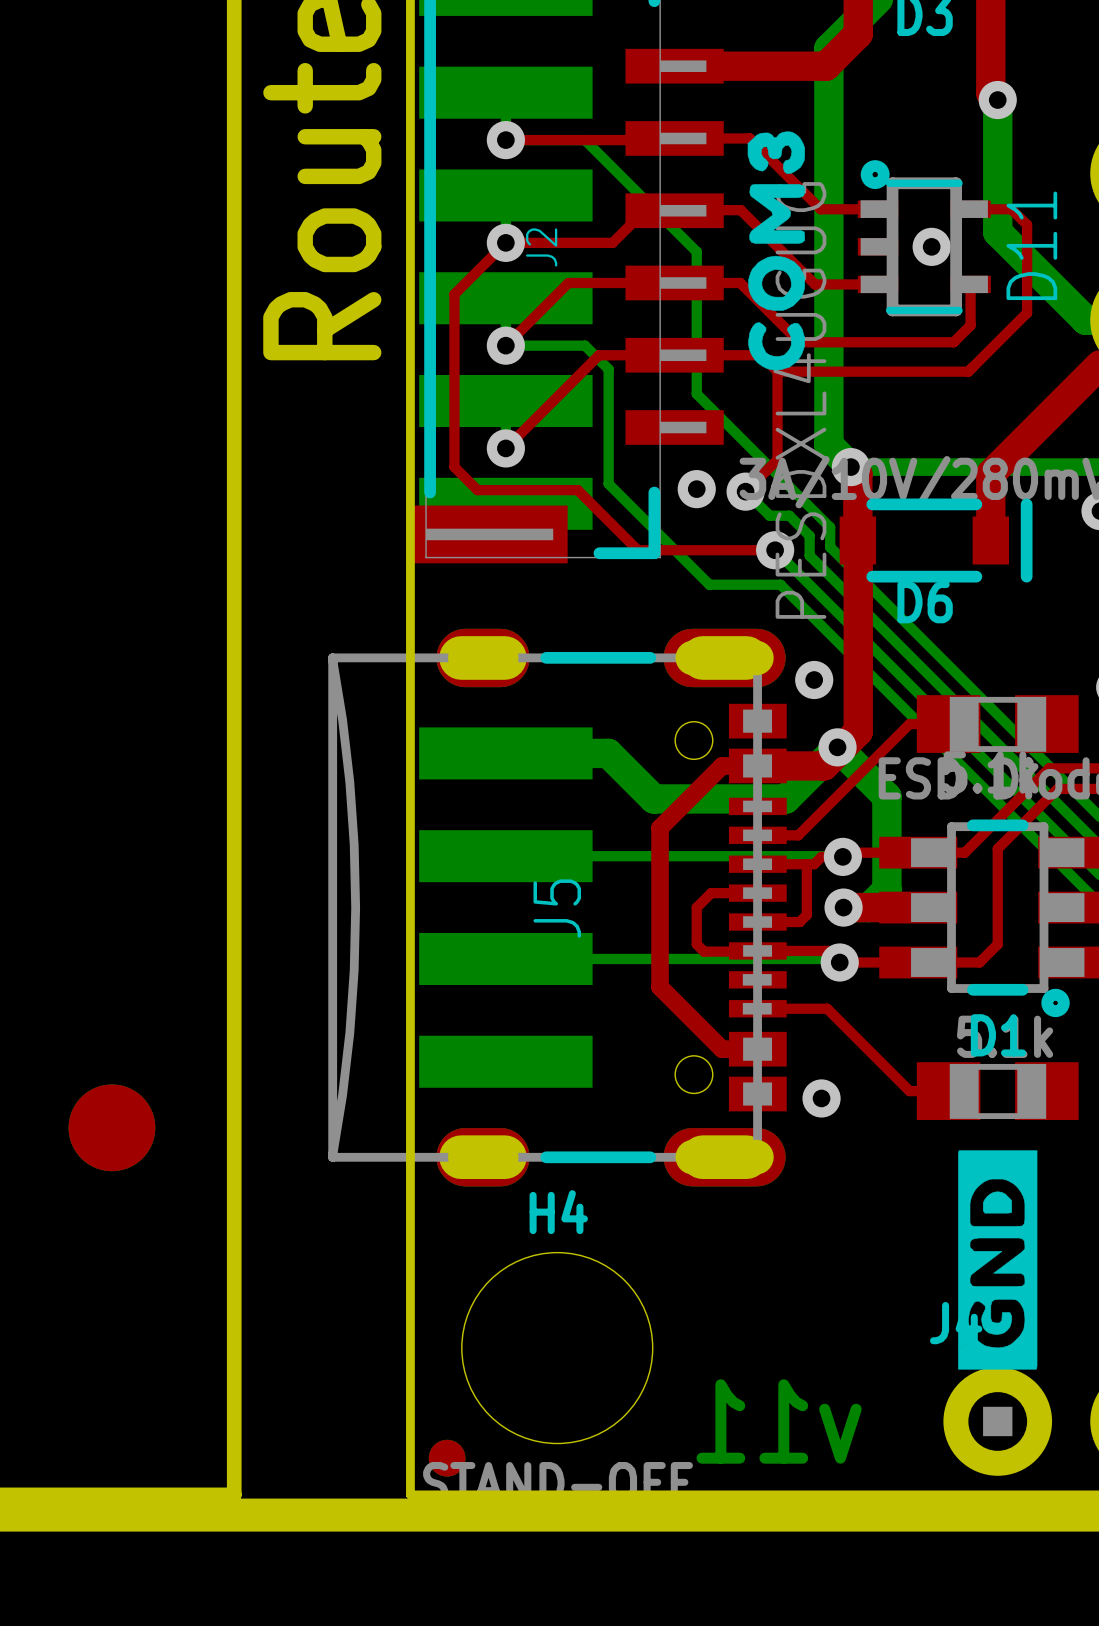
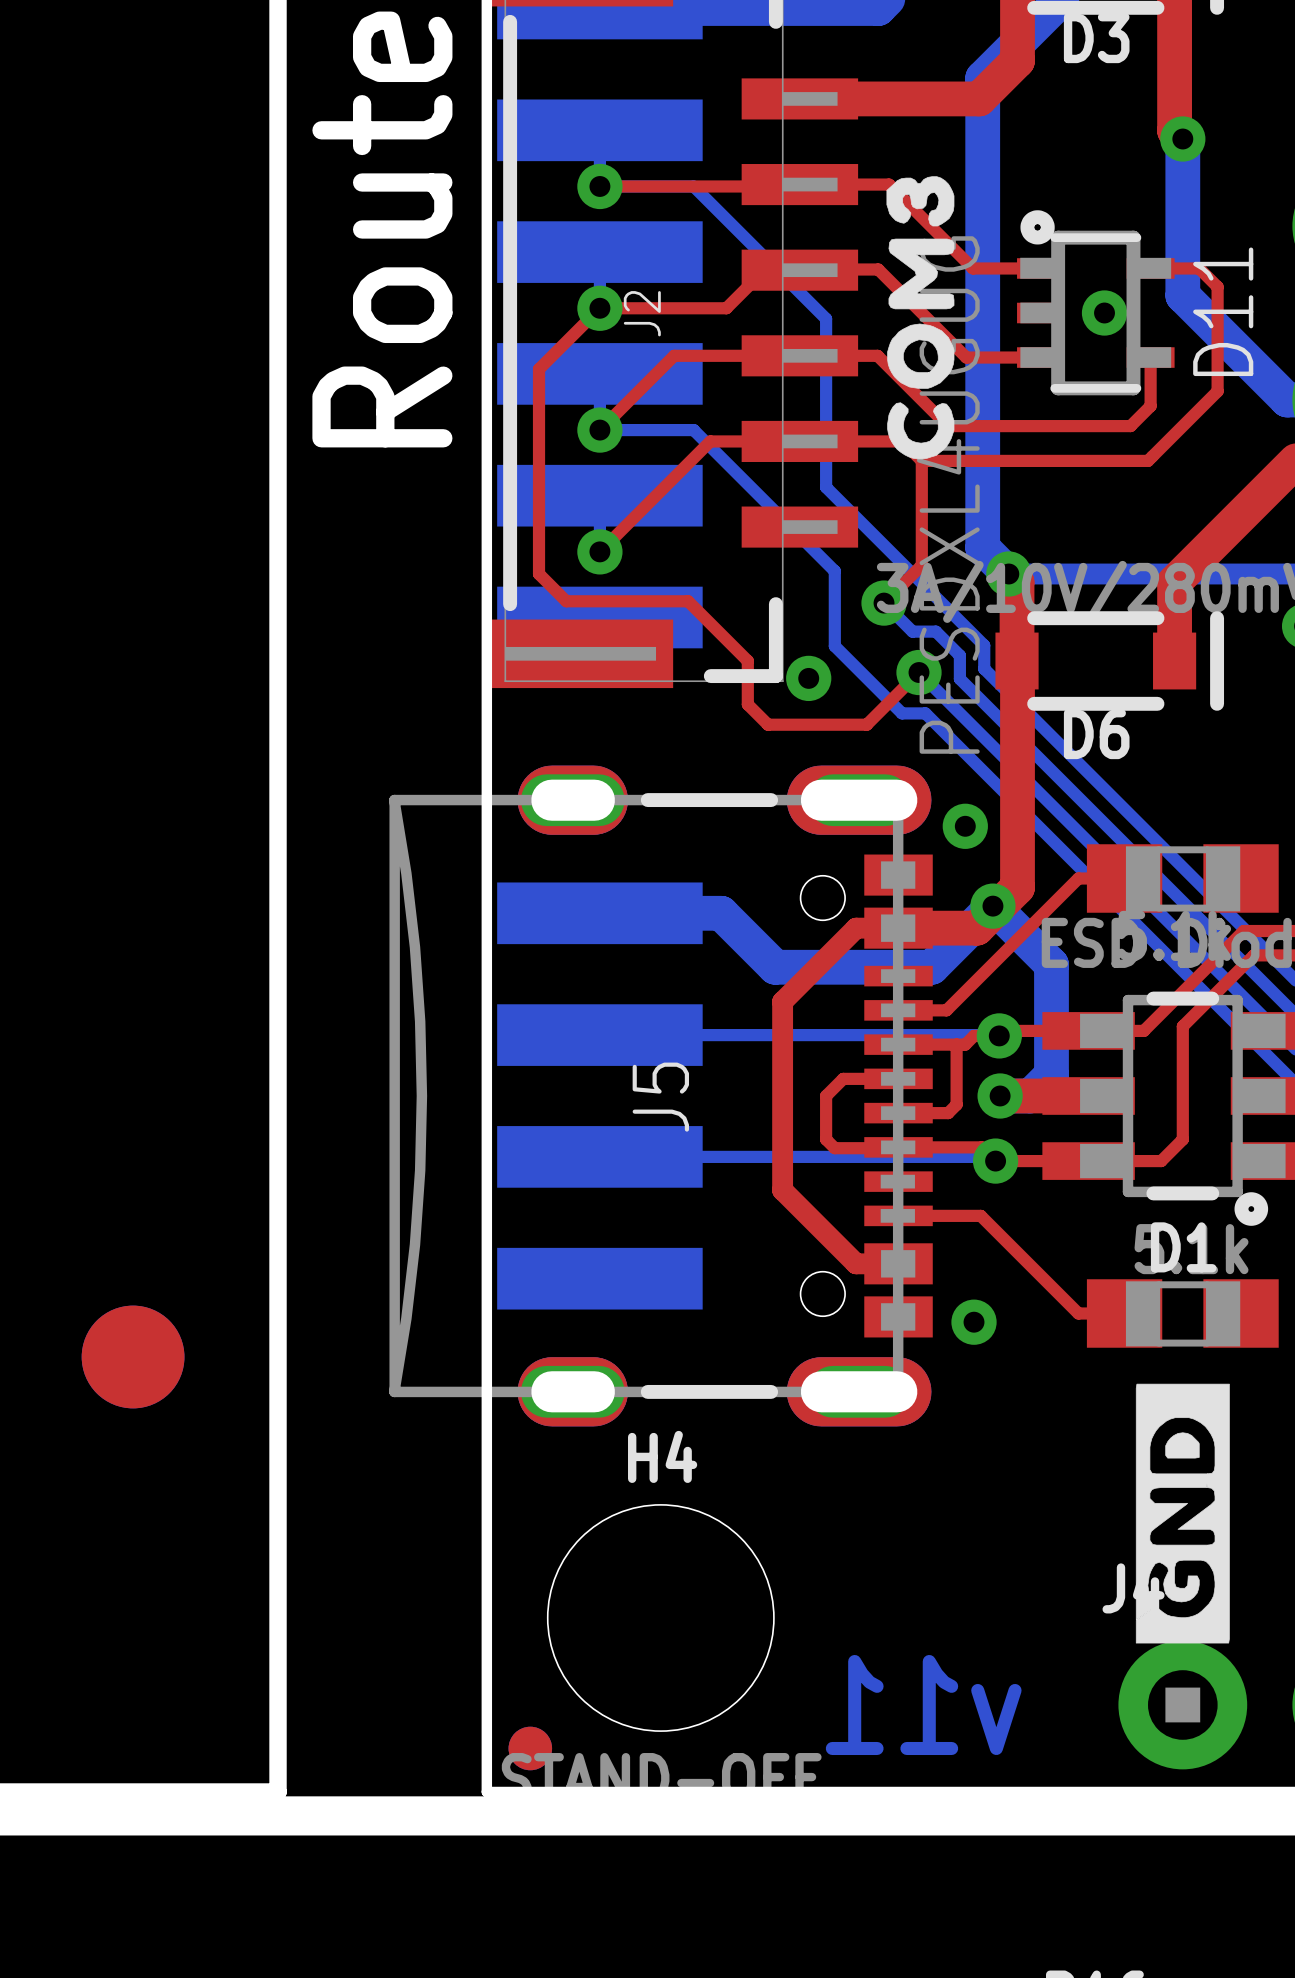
bottom track: (608, 369) (608, 483) (709, 584) (760, 584) -> (721, 458) (834, 571) (834, 646) (902, 713)
via position: (696, 489) -> (808, 678)
top track: (577, 490) (637, 550) (775, 550) -> (685, 601) (688, 601) (747, 661) (747, 704) (768, 724) (866, 724) (919, 672)

